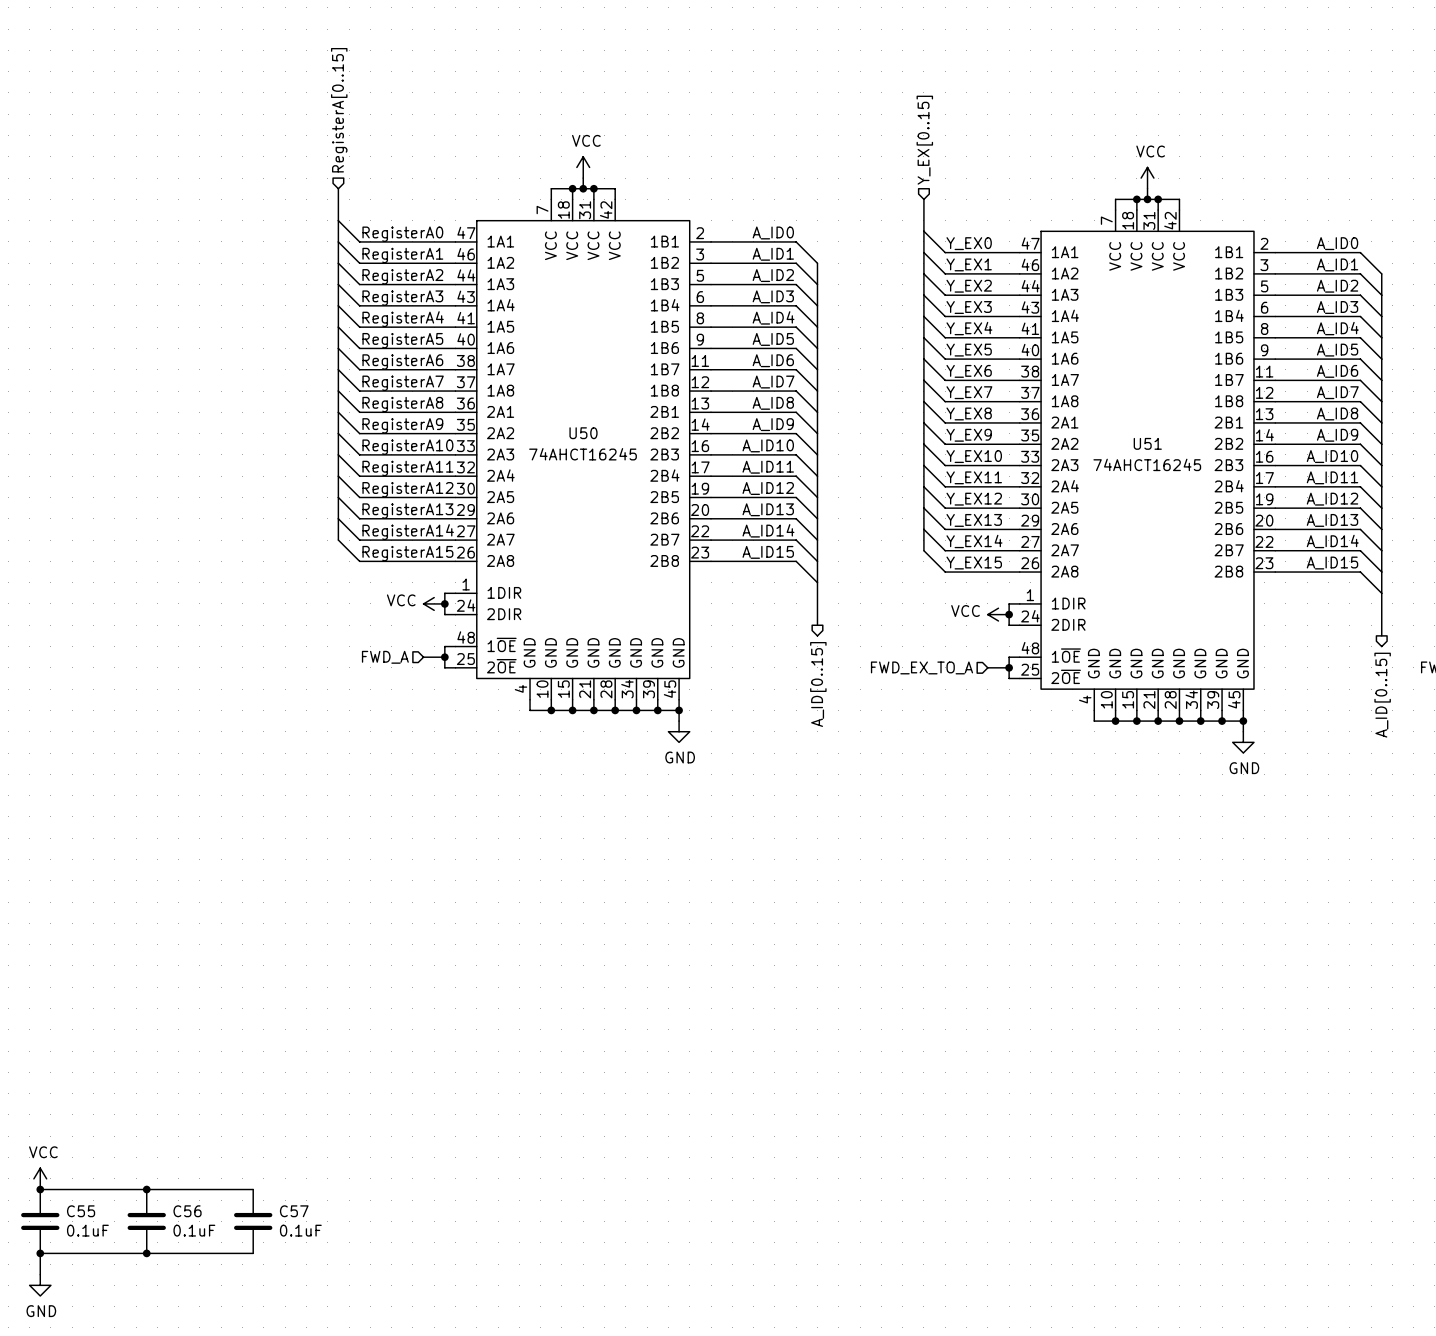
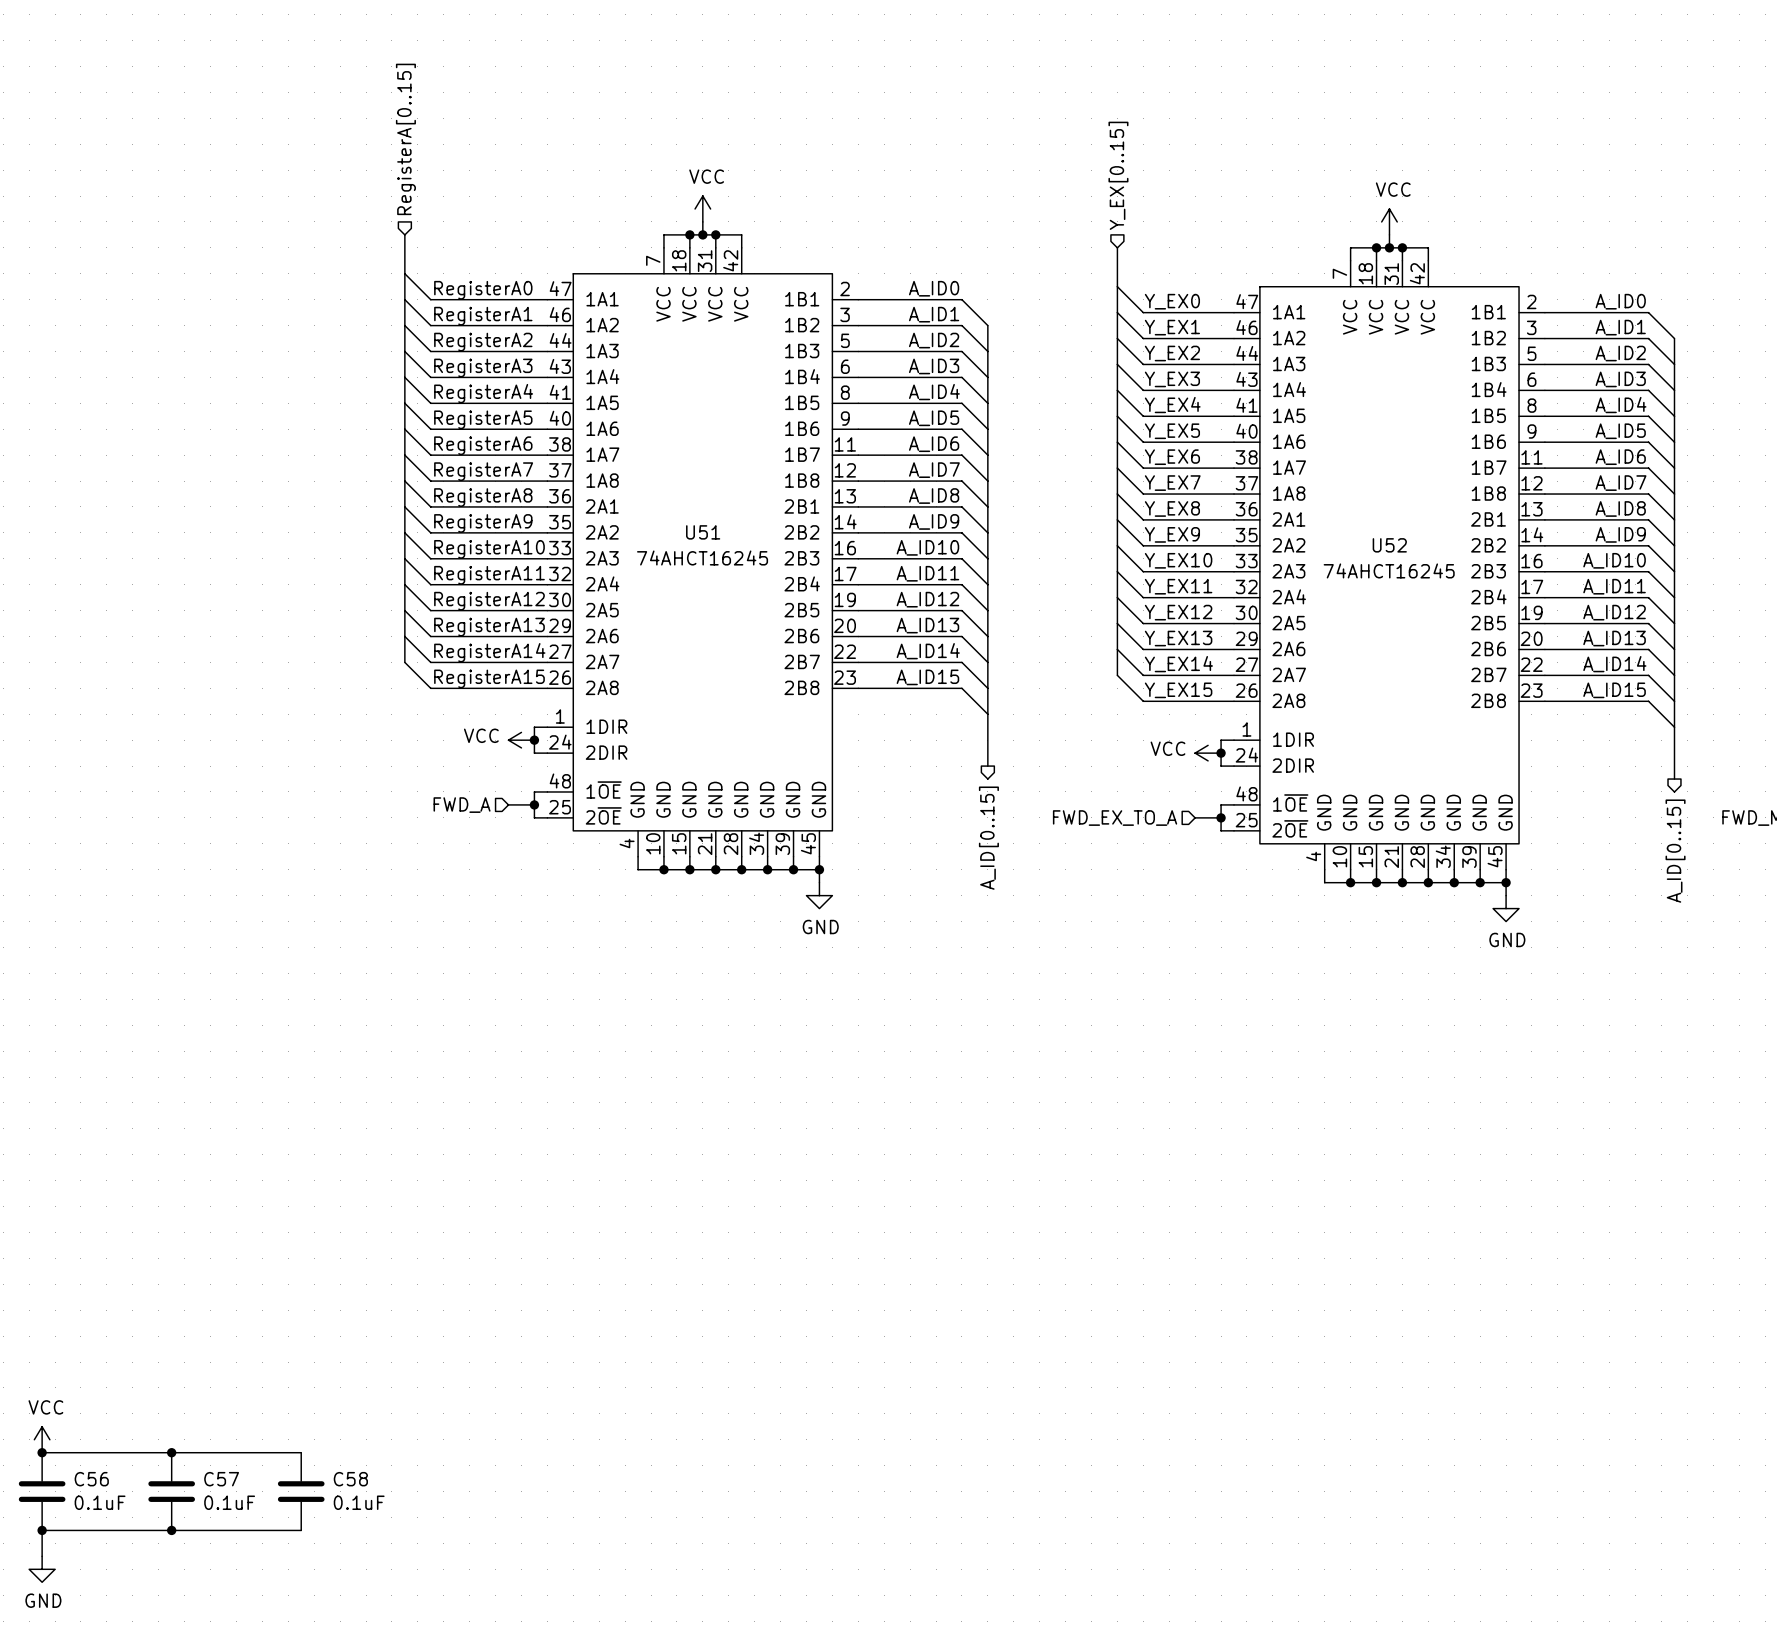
U50 name: U50 (583, 433) -> U51 (703, 532)
U51 name: U51 (1147, 443) -> U52 (1389, 545)
C55 name: C55 (81, 1211) -> C56 (91, 1479)
C56 name: C56 (187, 1211) -> C57 (221, 1479)
C57 name: C57 (294, 1211) -> C58 (350, 1479)

